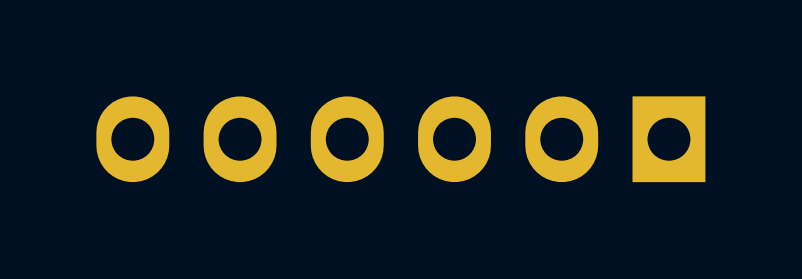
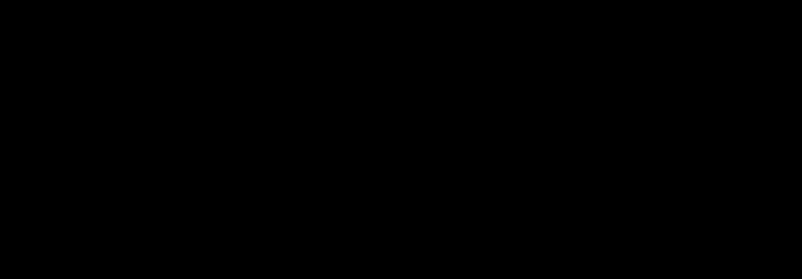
part: (400, 139) -> none

